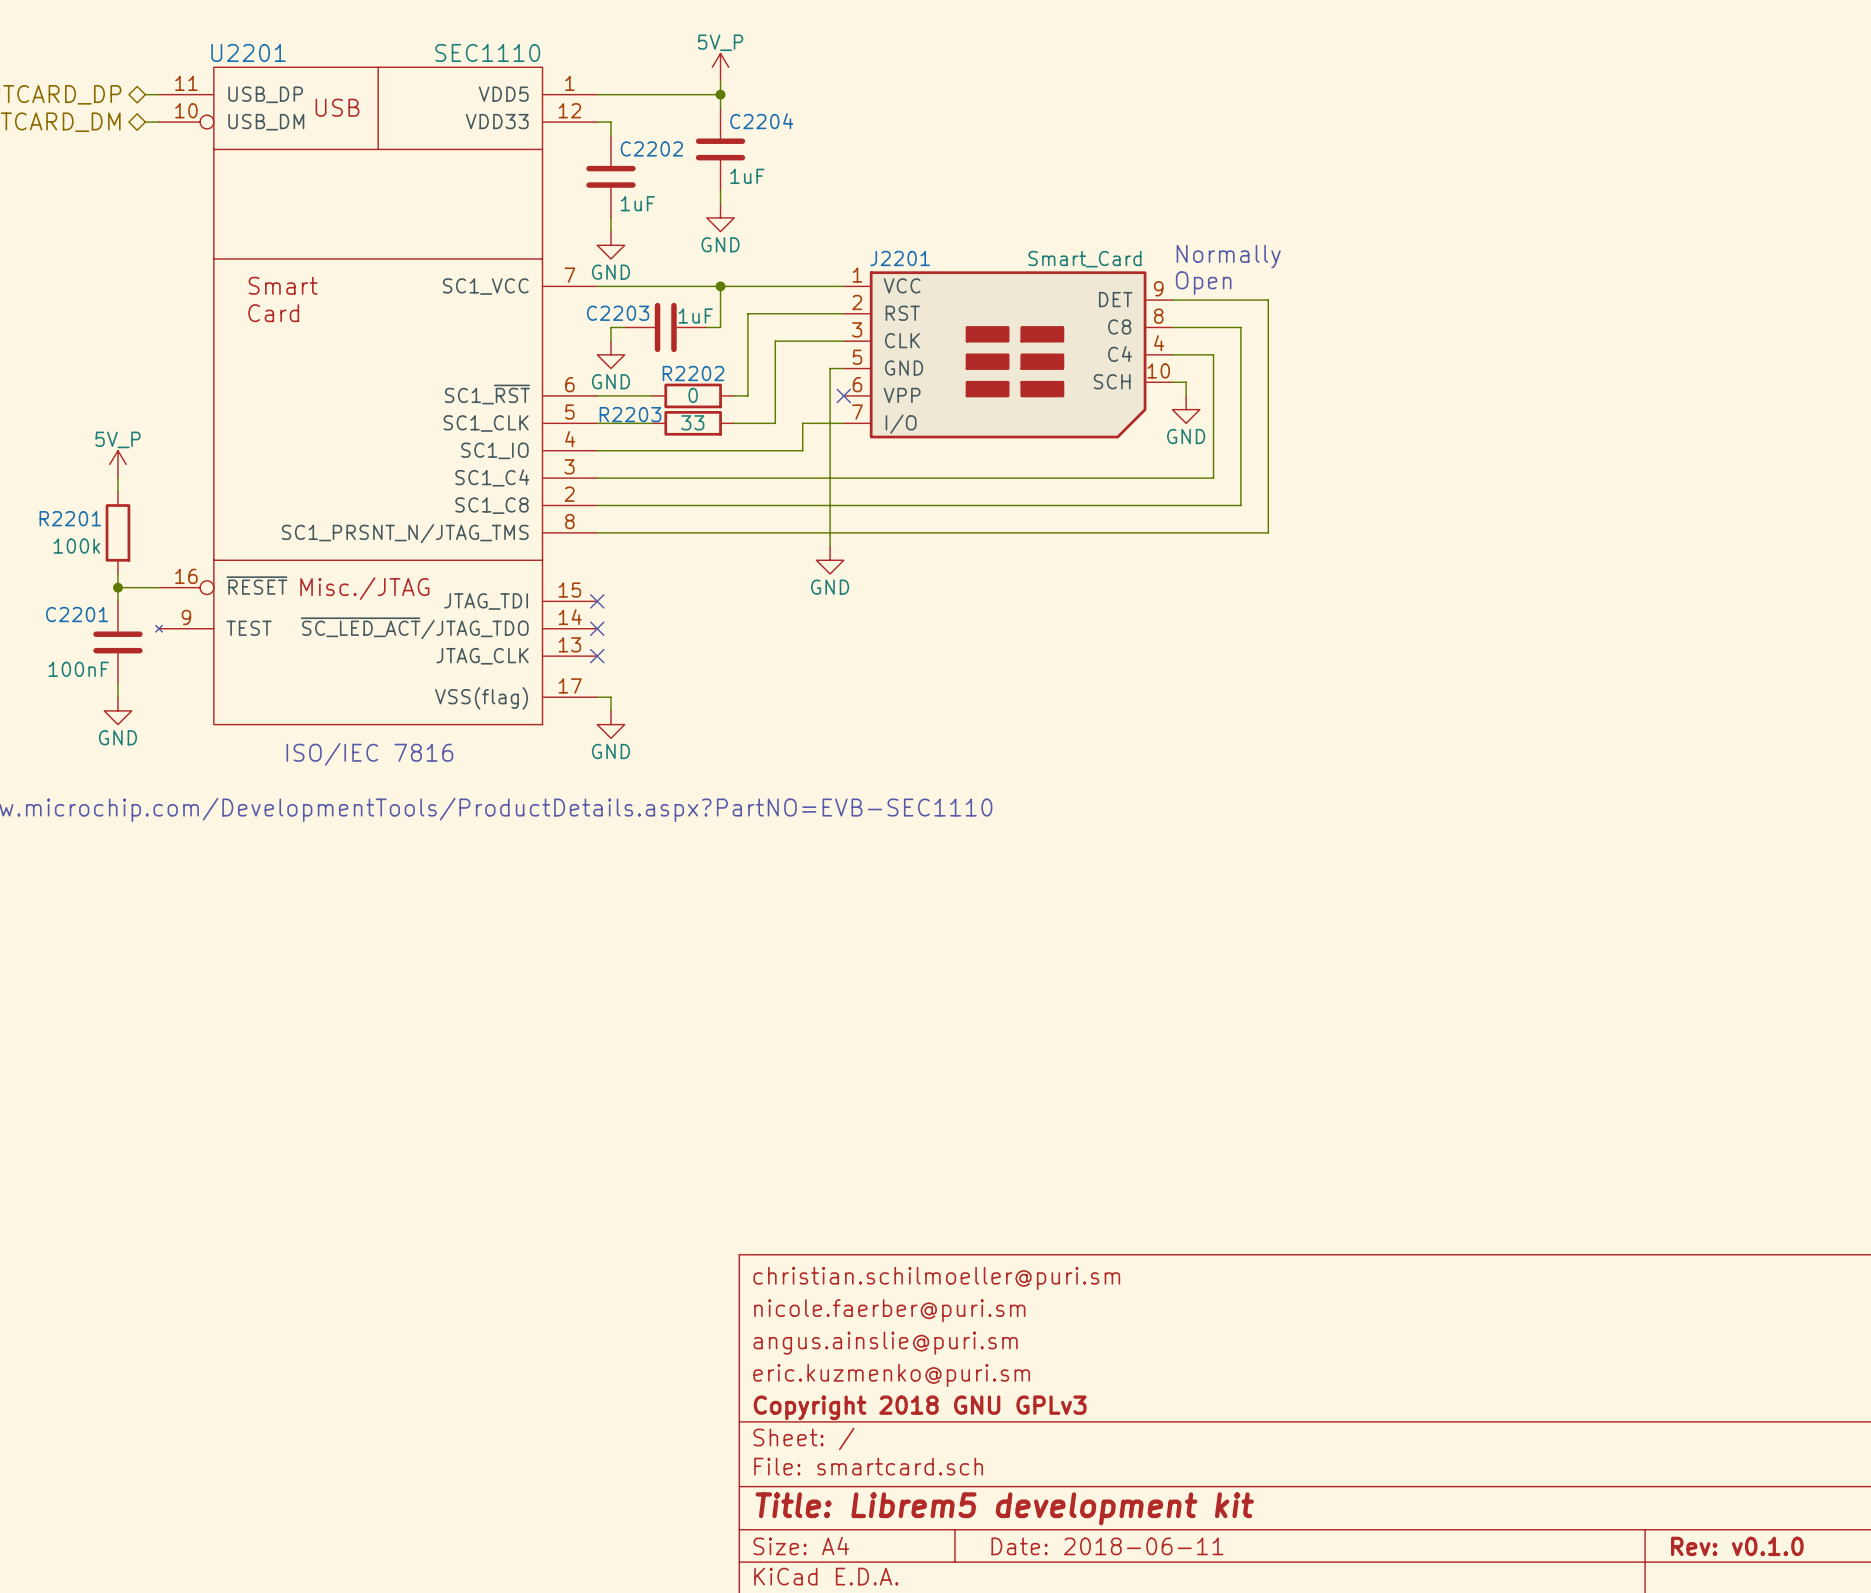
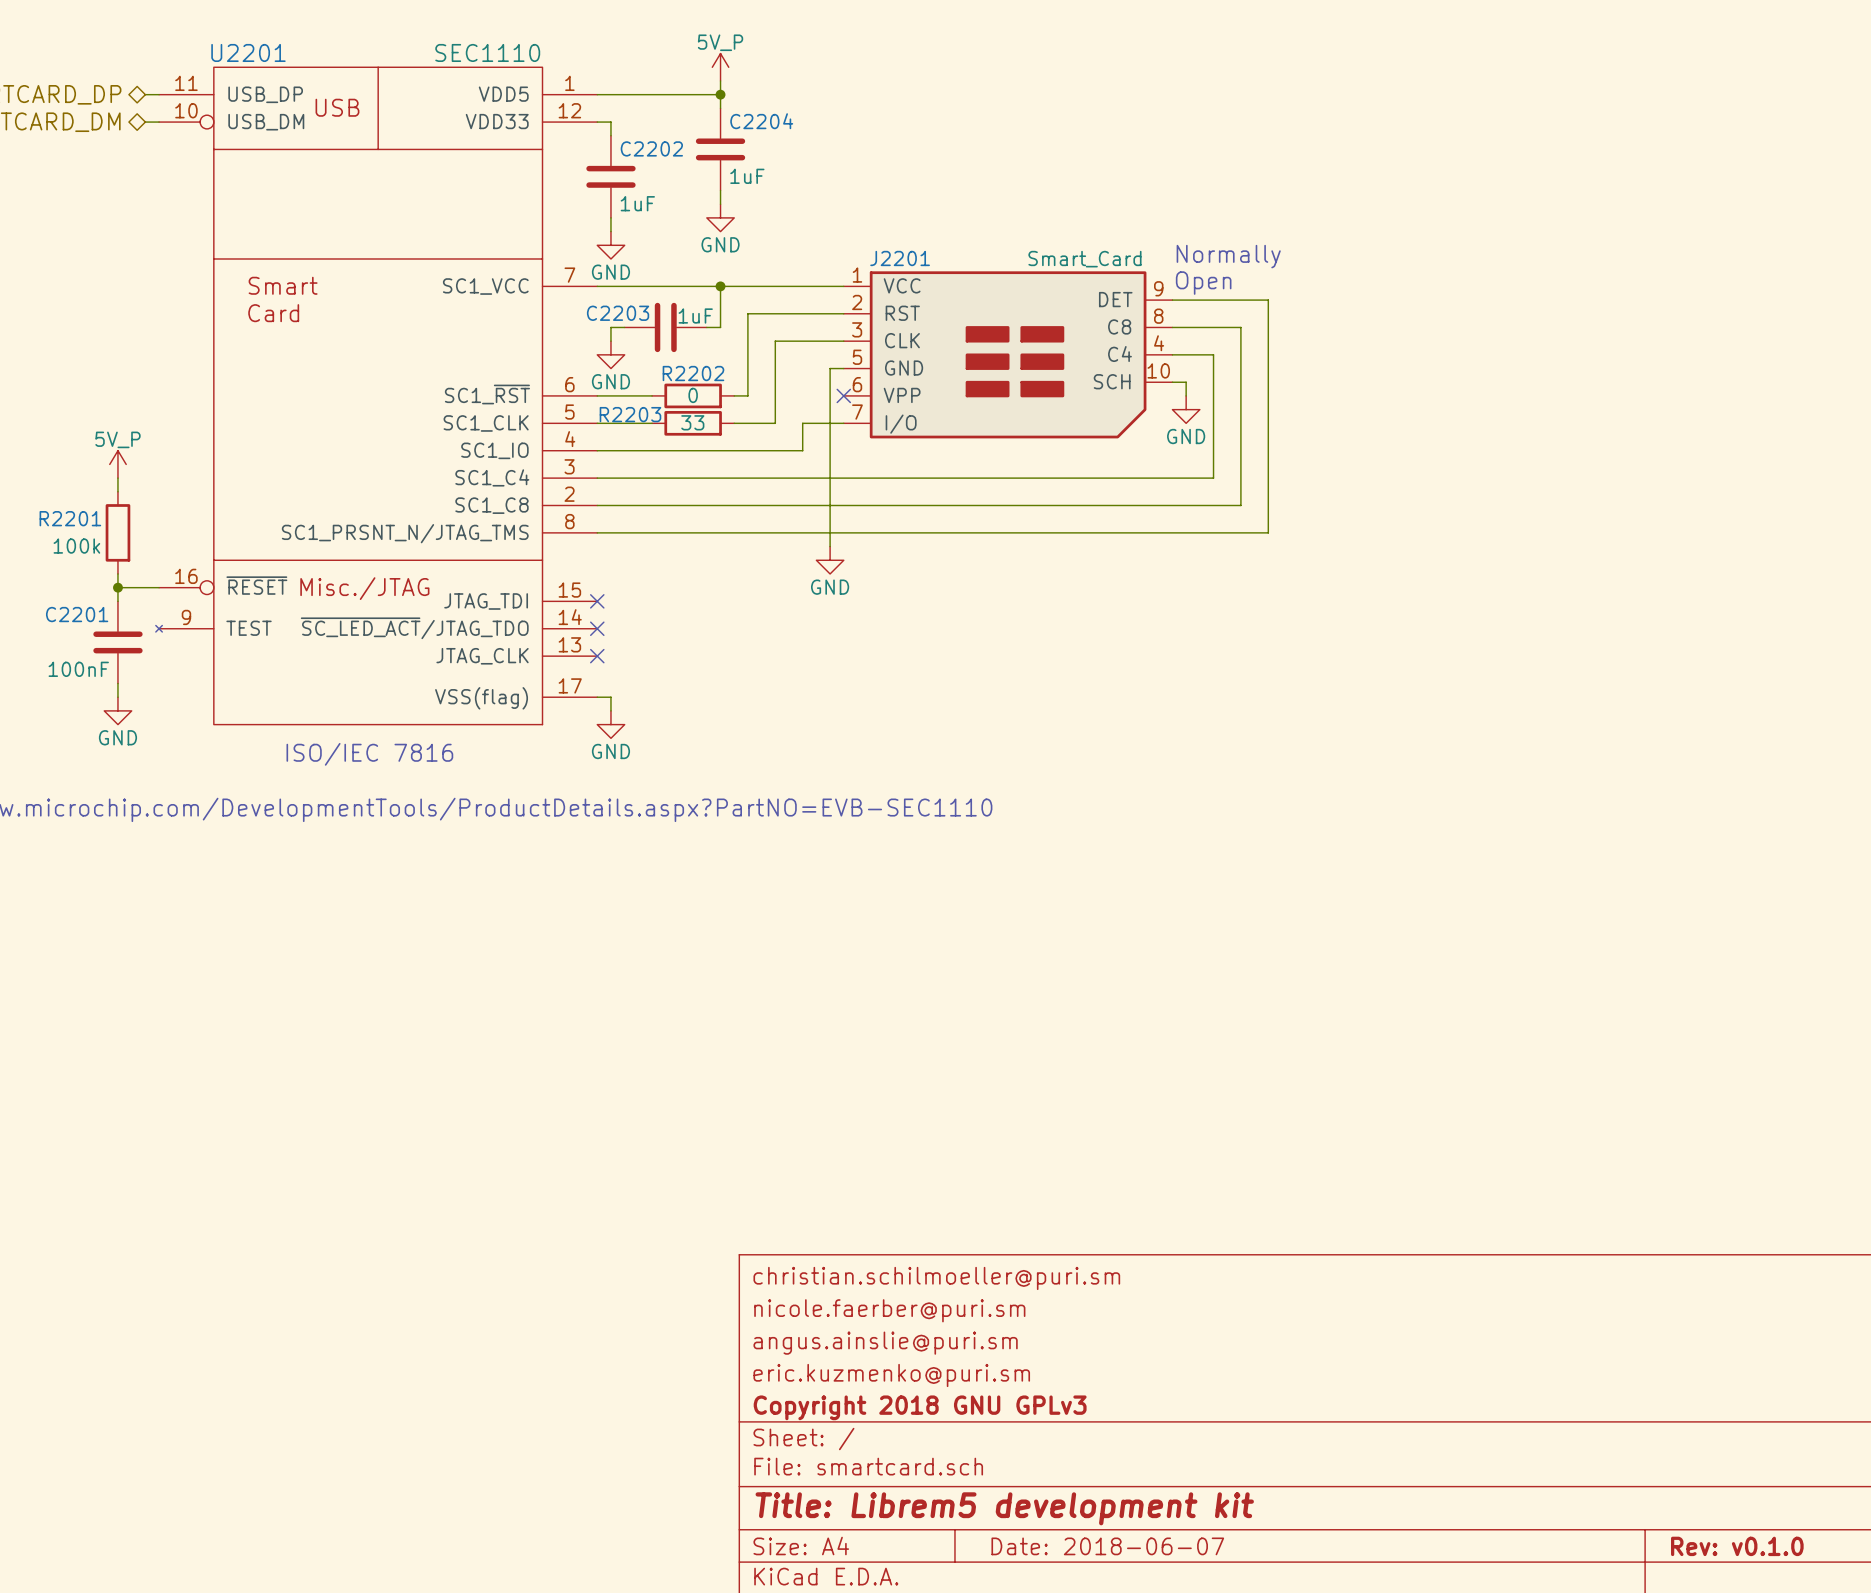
title block: Date: 2018-06-11 (1107, 1546) -> Date: 2018-06-07 (1107, 1546)

